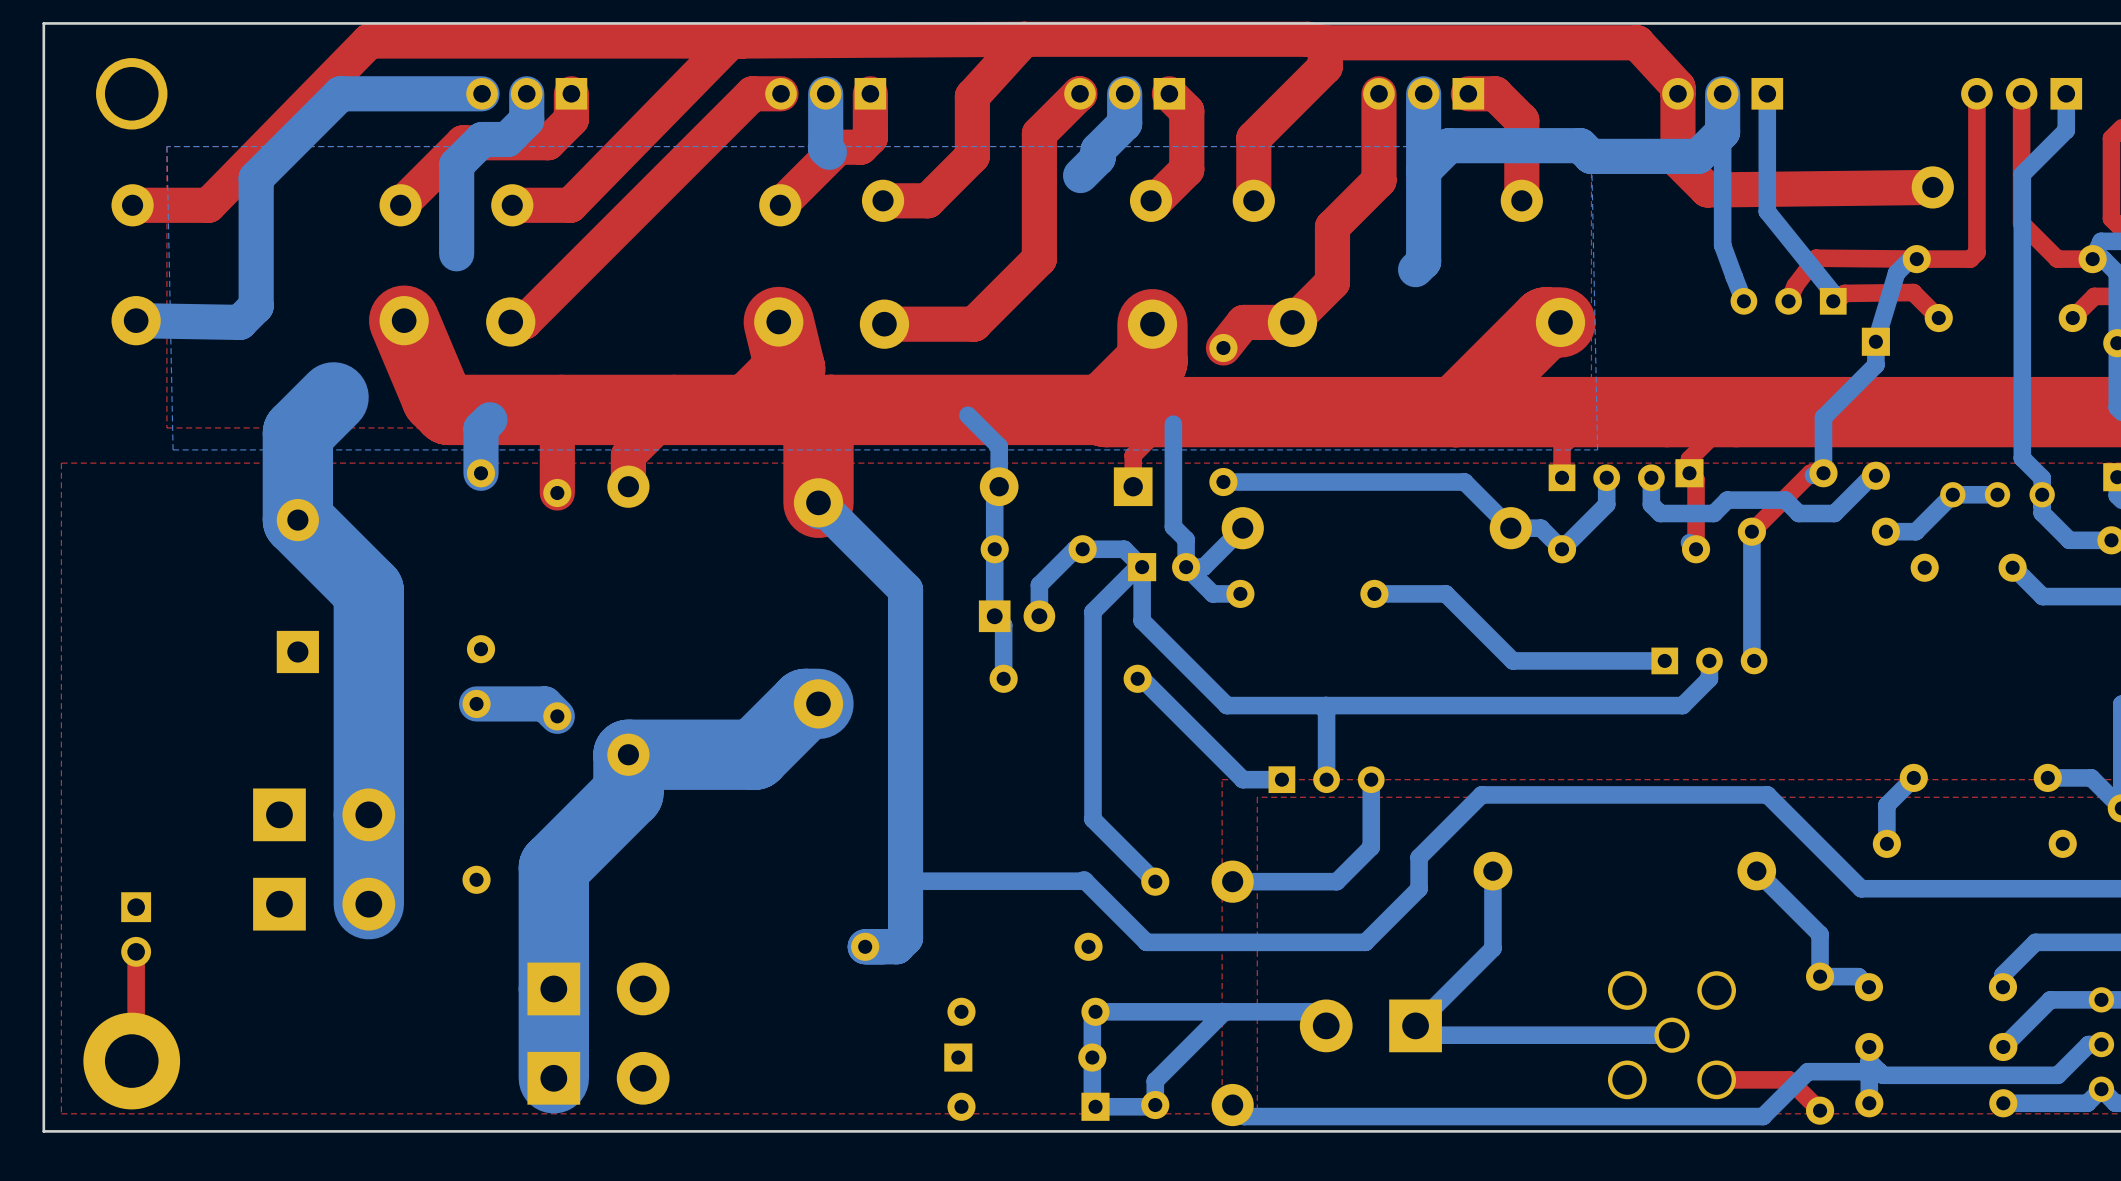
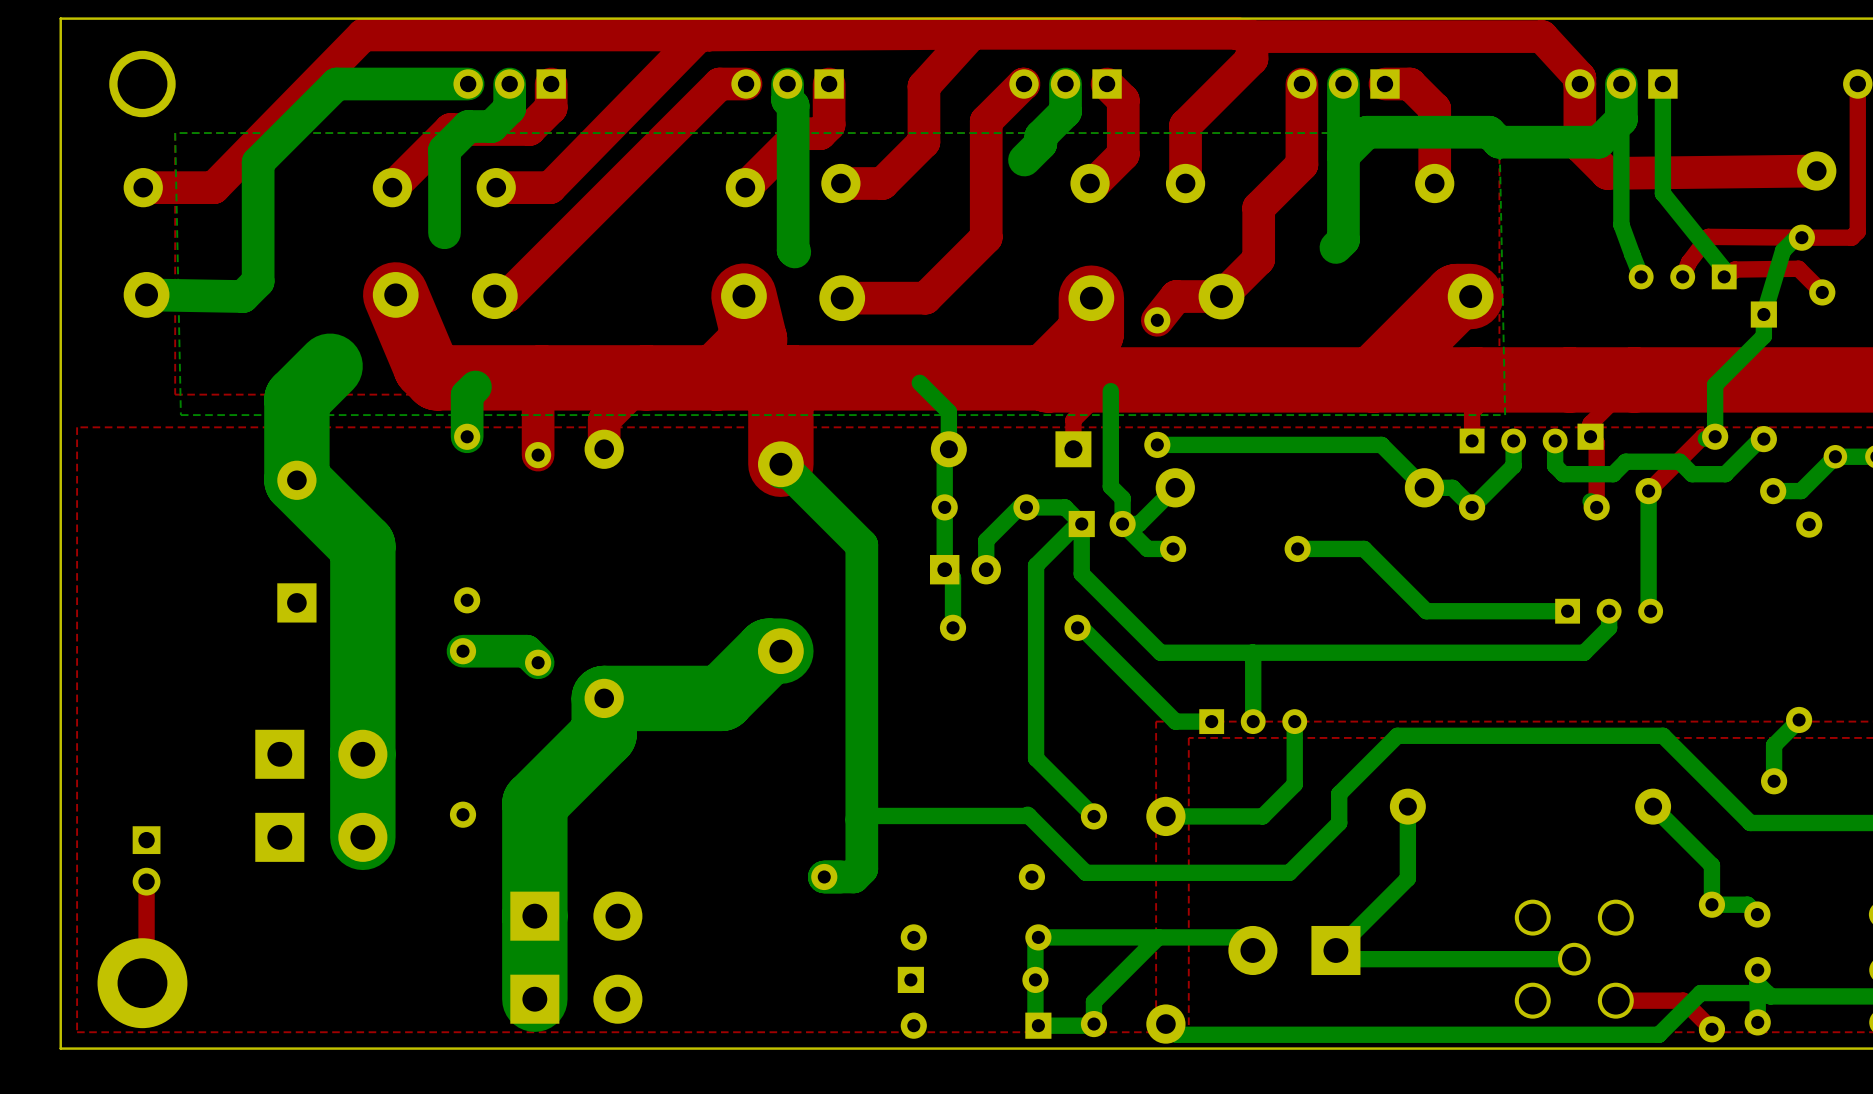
bottom track: (825, 111) (825, 148) (829, 152) -> (787, 100) (793, 105) (793, 250) (794, 251)

